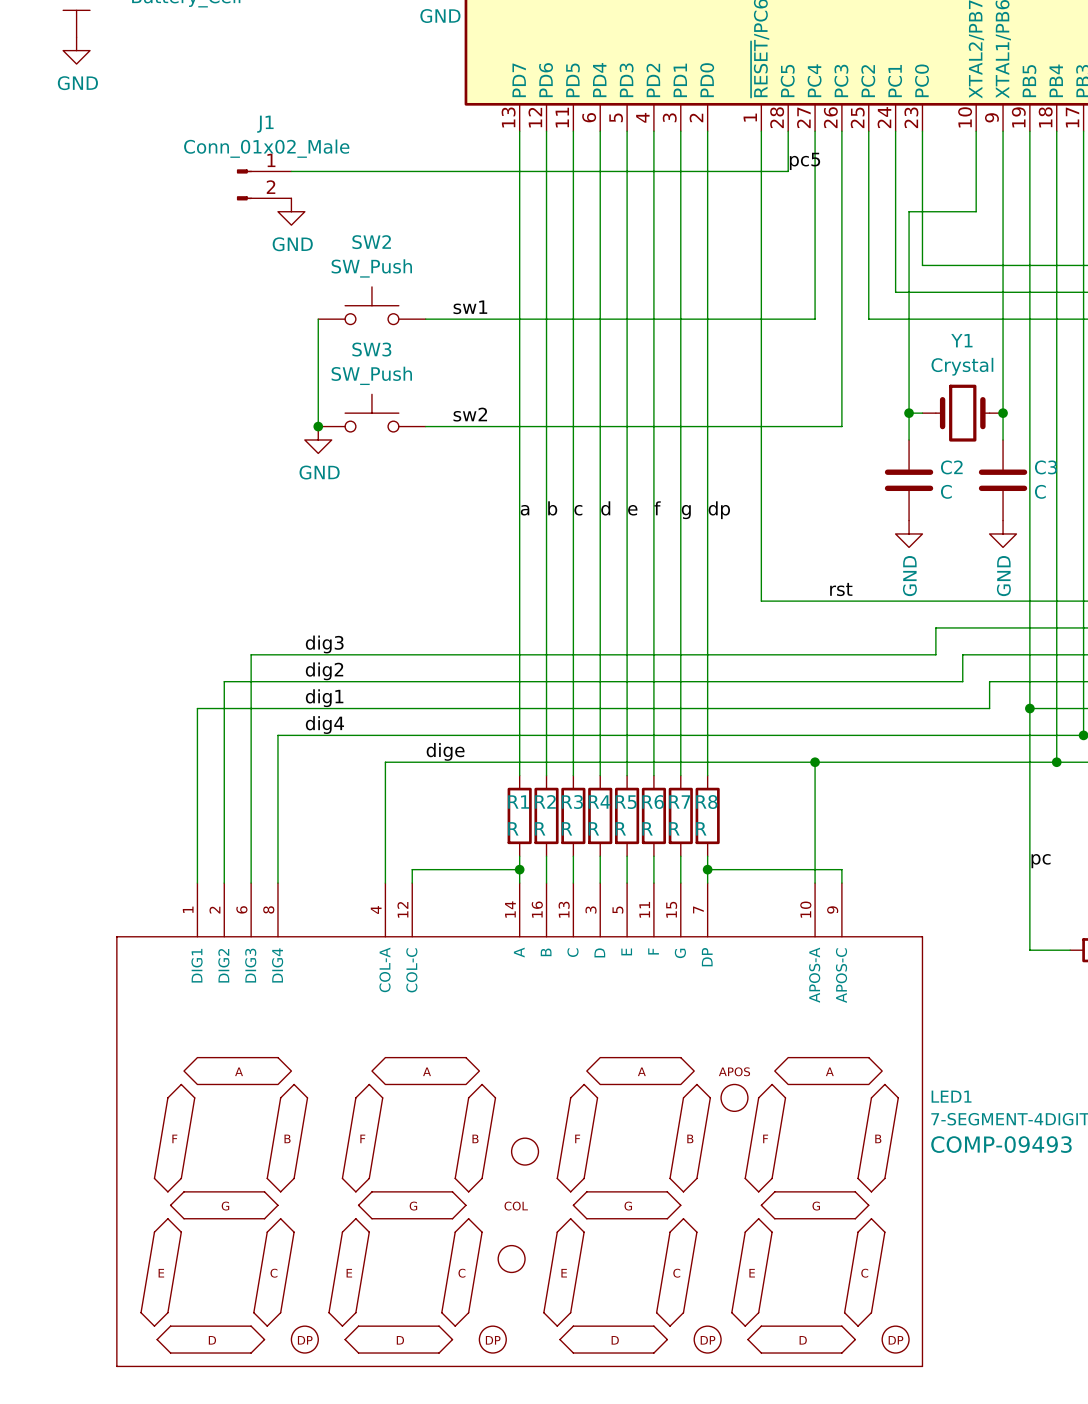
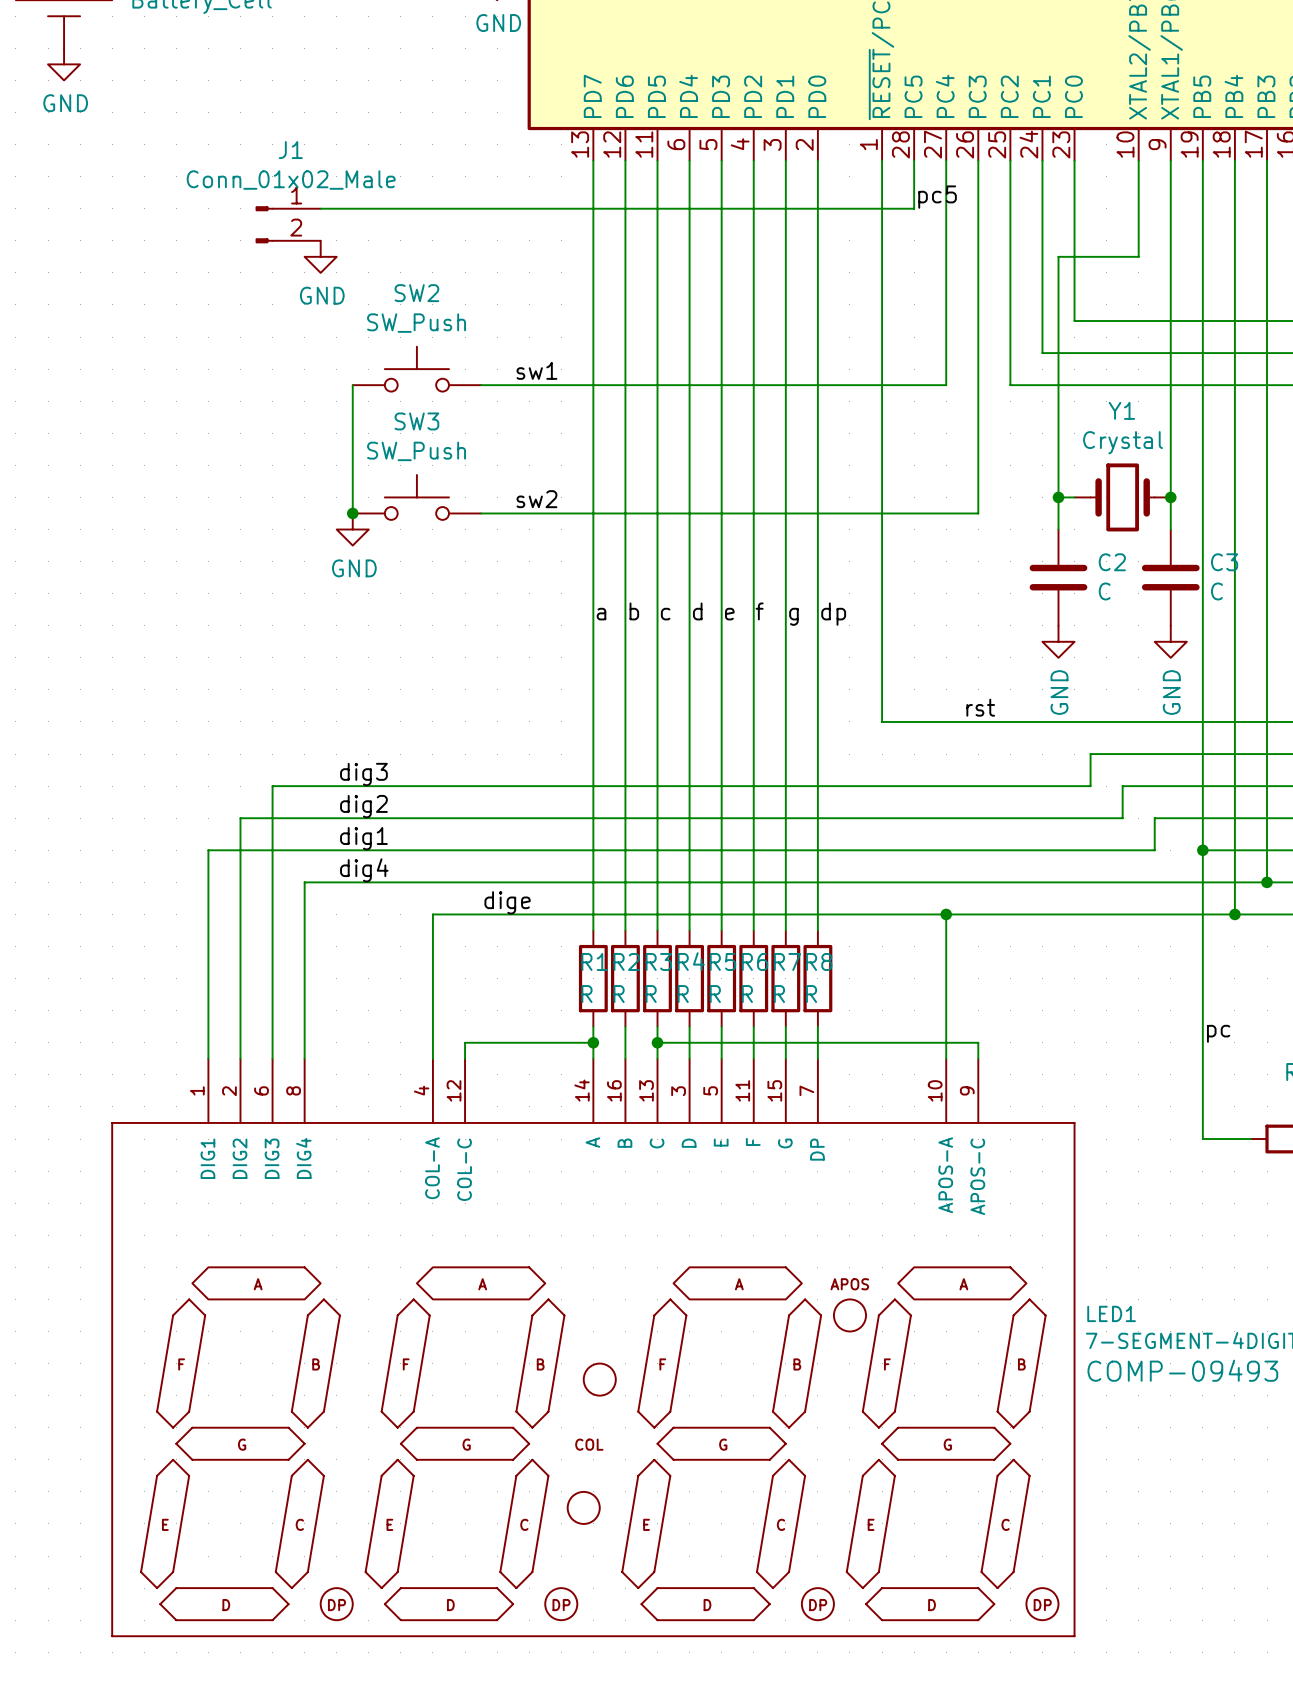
wire: none -> (657, 1042) (817, 1042)
junction: none -> (657, 1042)
junction: (707, 869) -> none

